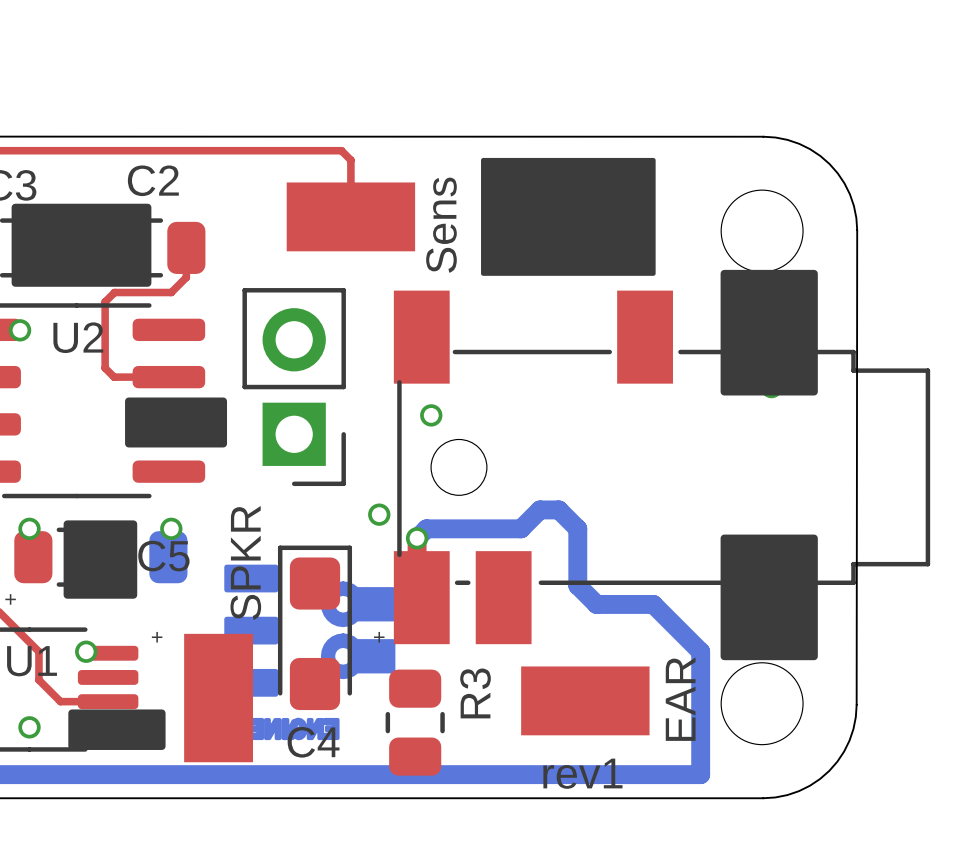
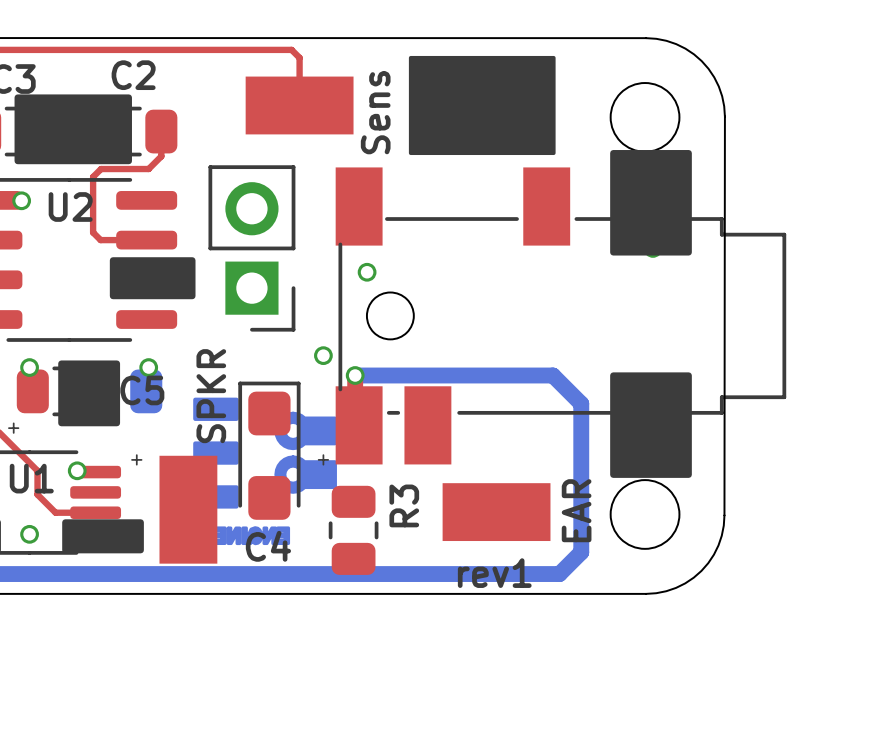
bottom track: (417, 538) (426, 528) (521, 528) (539, 509) (558, 509) (577, 528) (577, 585) (596, 604) (653, 604) (700, 651) (700, 774) (660, 774) -> (355, 375) (552, 375) (581, 403) (581, 552) (559, 574)

